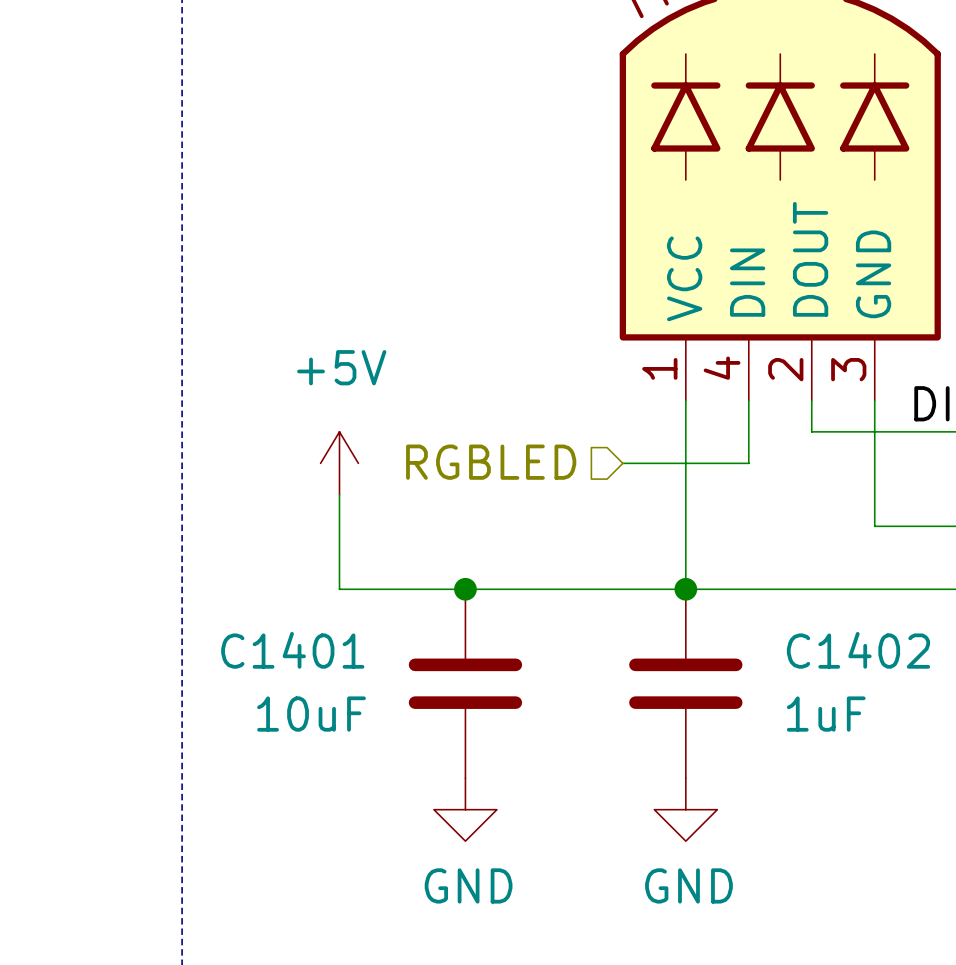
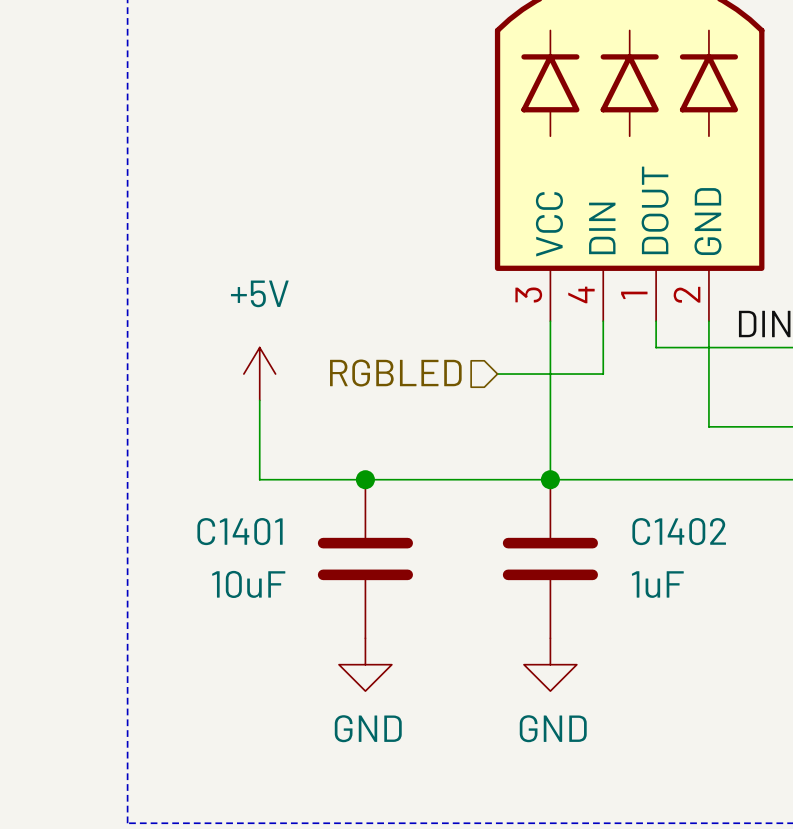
part pin number: 1 (659, 368) -> 3 (528, 295)
part pin number: 2 (785, 369) -> 1 (634, 295)
part pin number: 3 (848, 369) -> 2 (687, 294)

